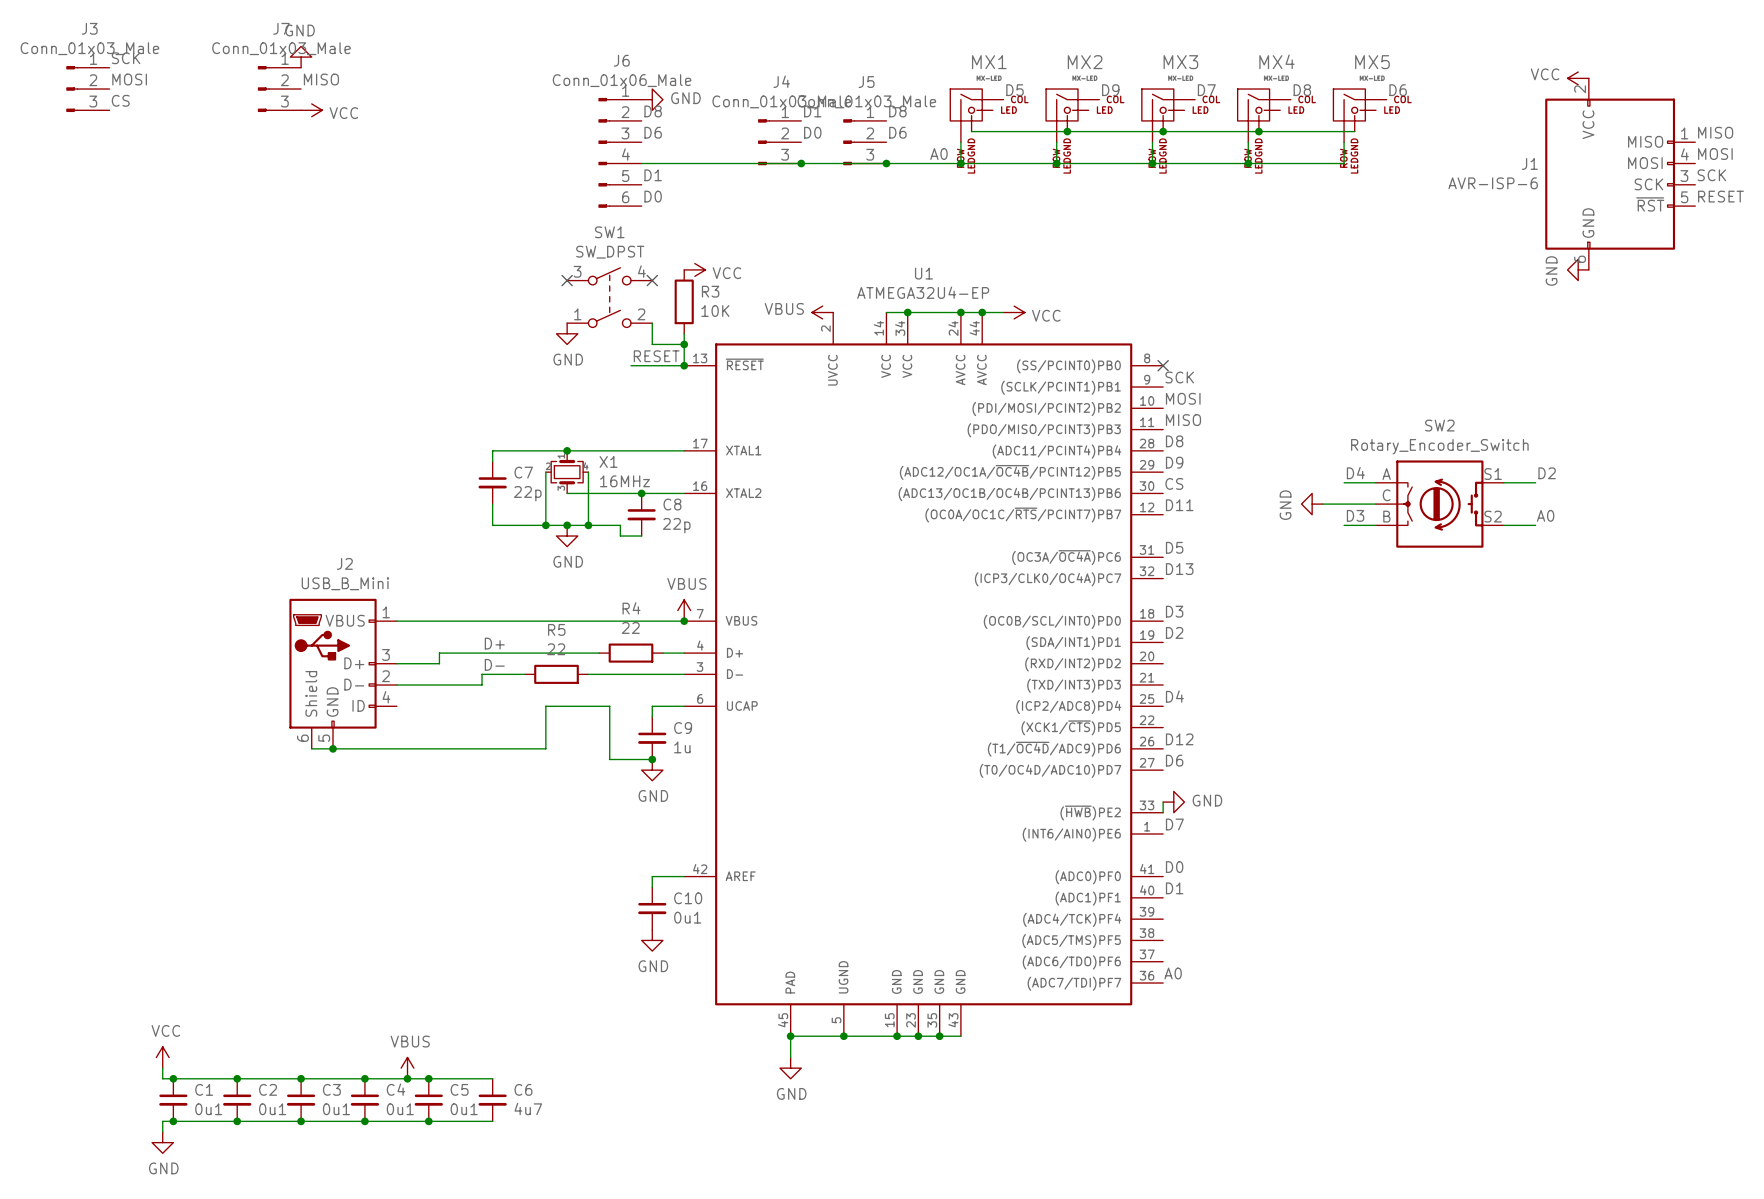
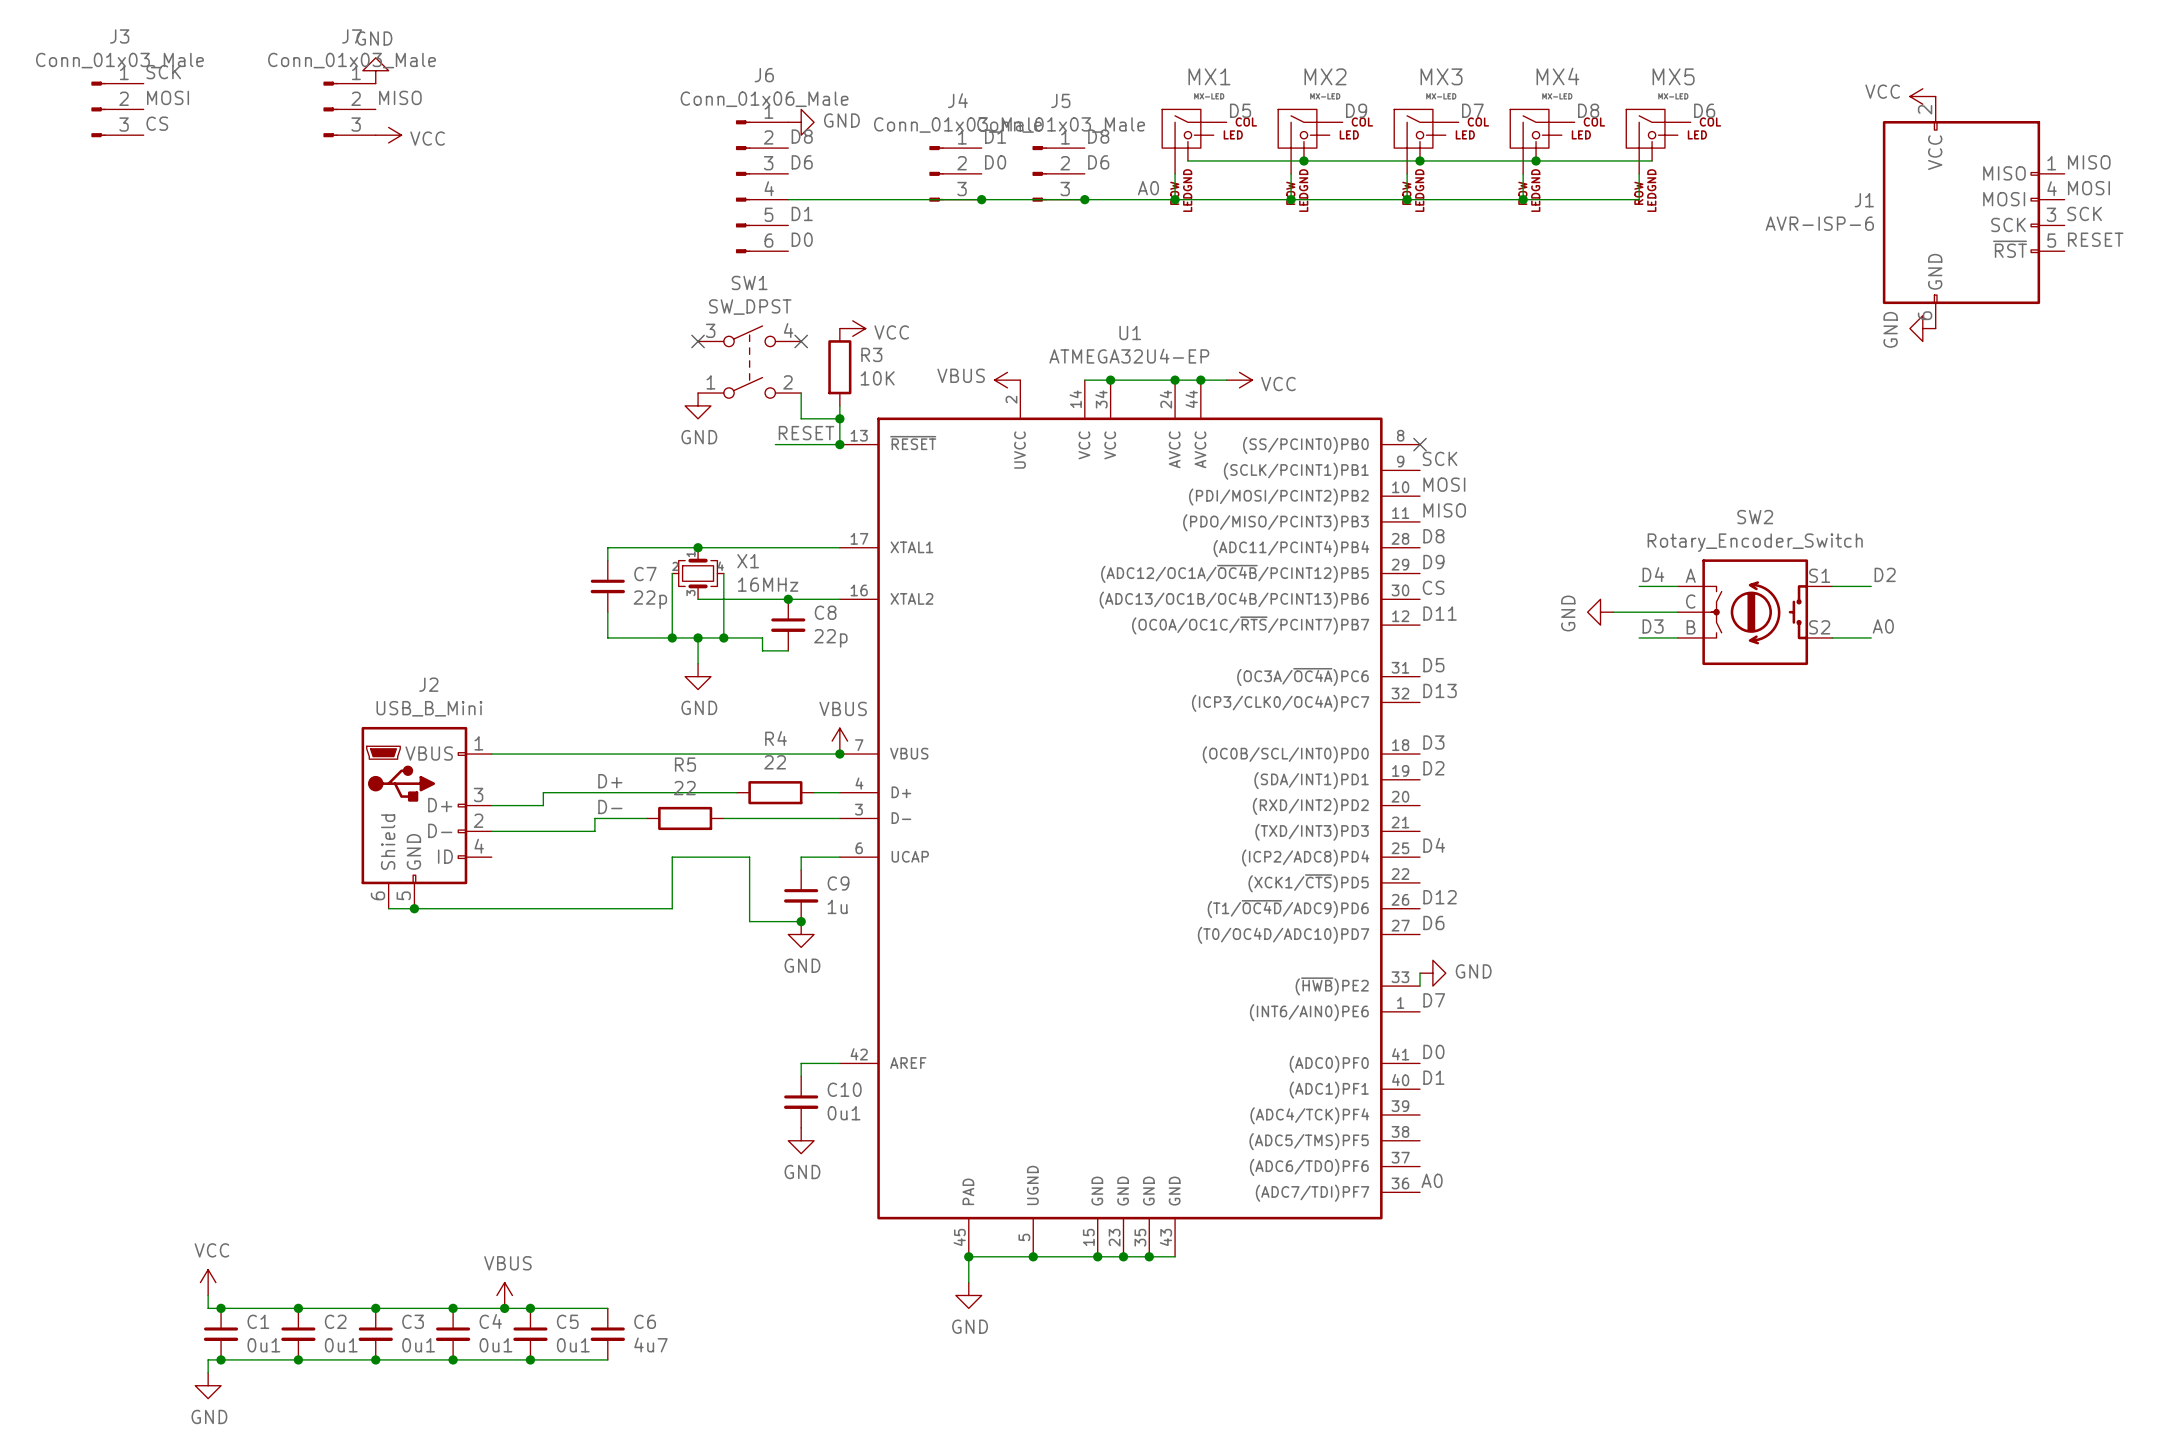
power symbol position: GND (567, 536) -> GND (698, 676)

